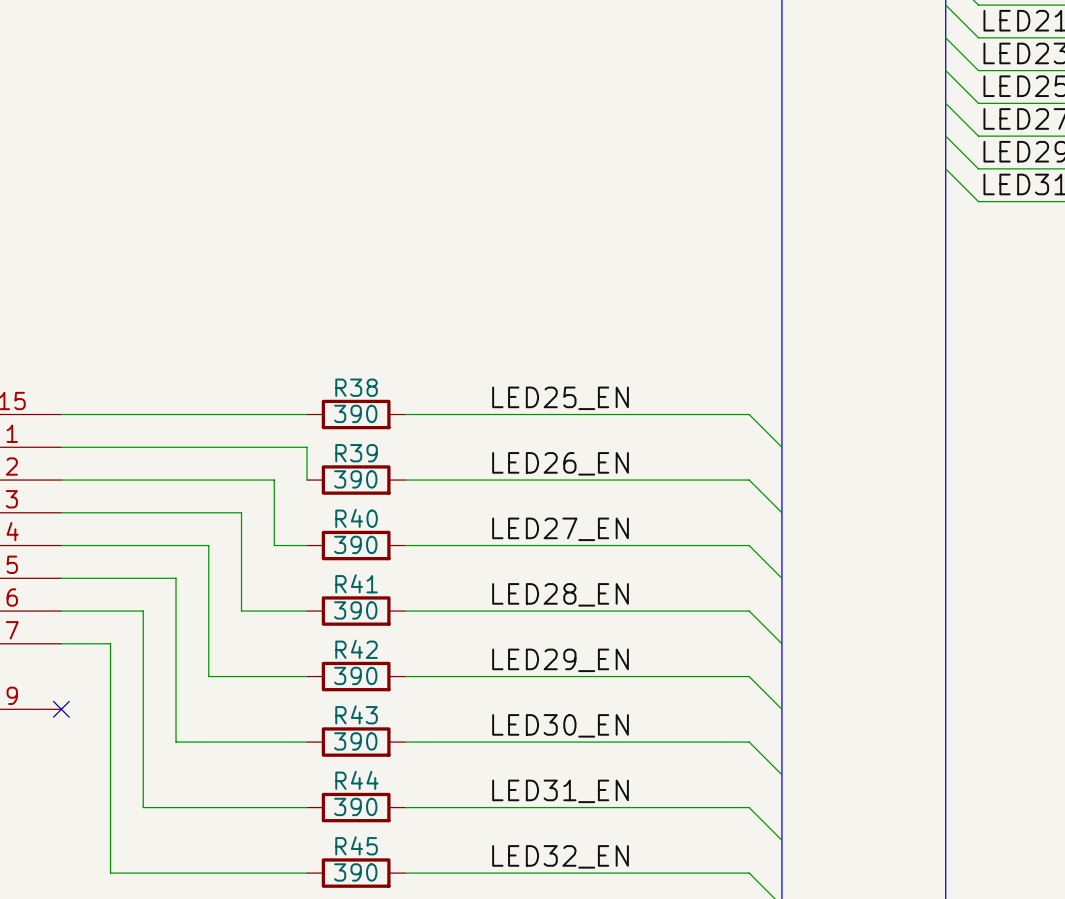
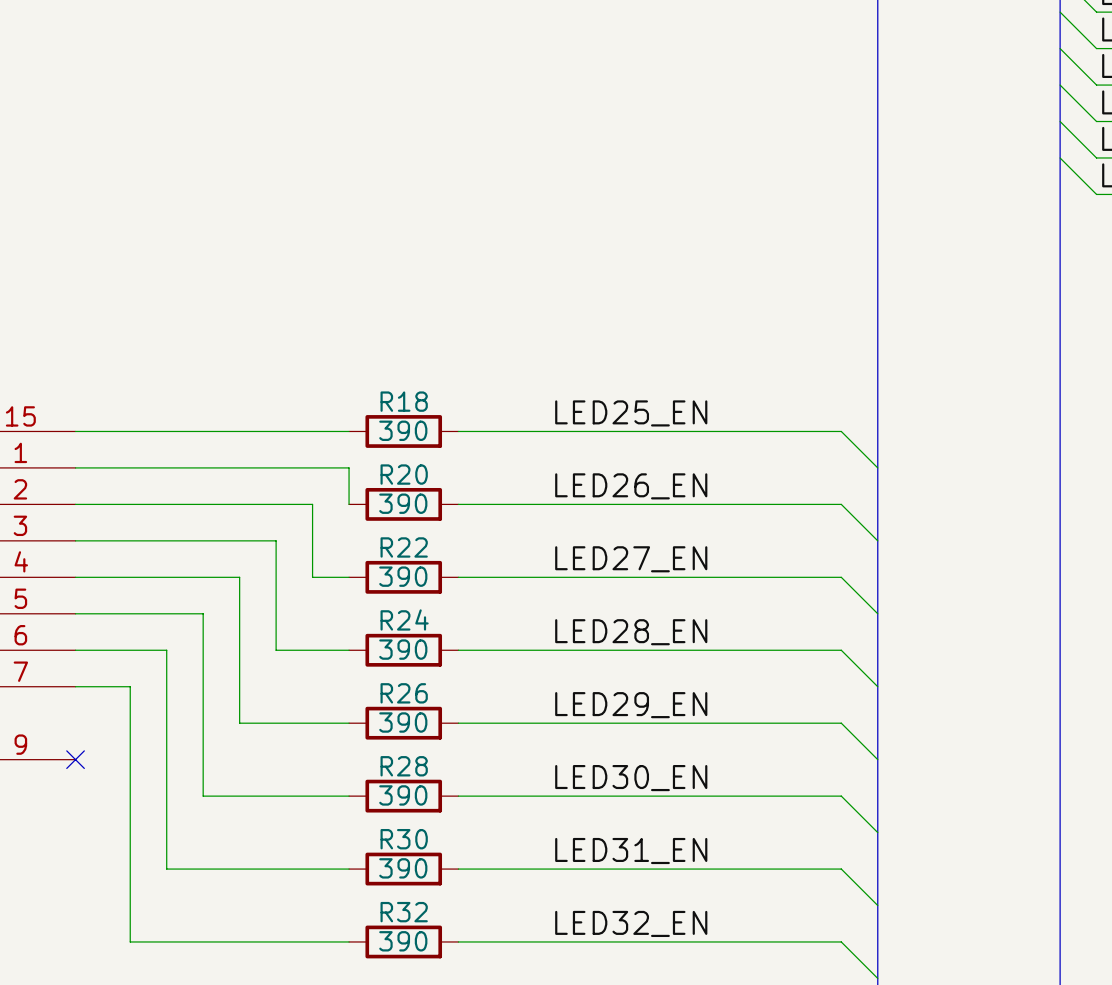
R38 name: R38 (356, 387) -> R18 (404, 401)
R39 name: R39 (356, 453) -> R20 (404, 474)
R40 name: R40 (356, 518) -> R22 (404, 547)
R41 name: R41 (356, 583) -> R24 (404, 619)
R42 name: R42 (356, 649) -> R26 (404, 693)
R43 name: R43 (356, 714) -> R28 (404, 766)
R44 name: R44 (356, 780) -> R30 (404, 839)
R45 name: R45 (356, 845) -> R32 (404, 912)

